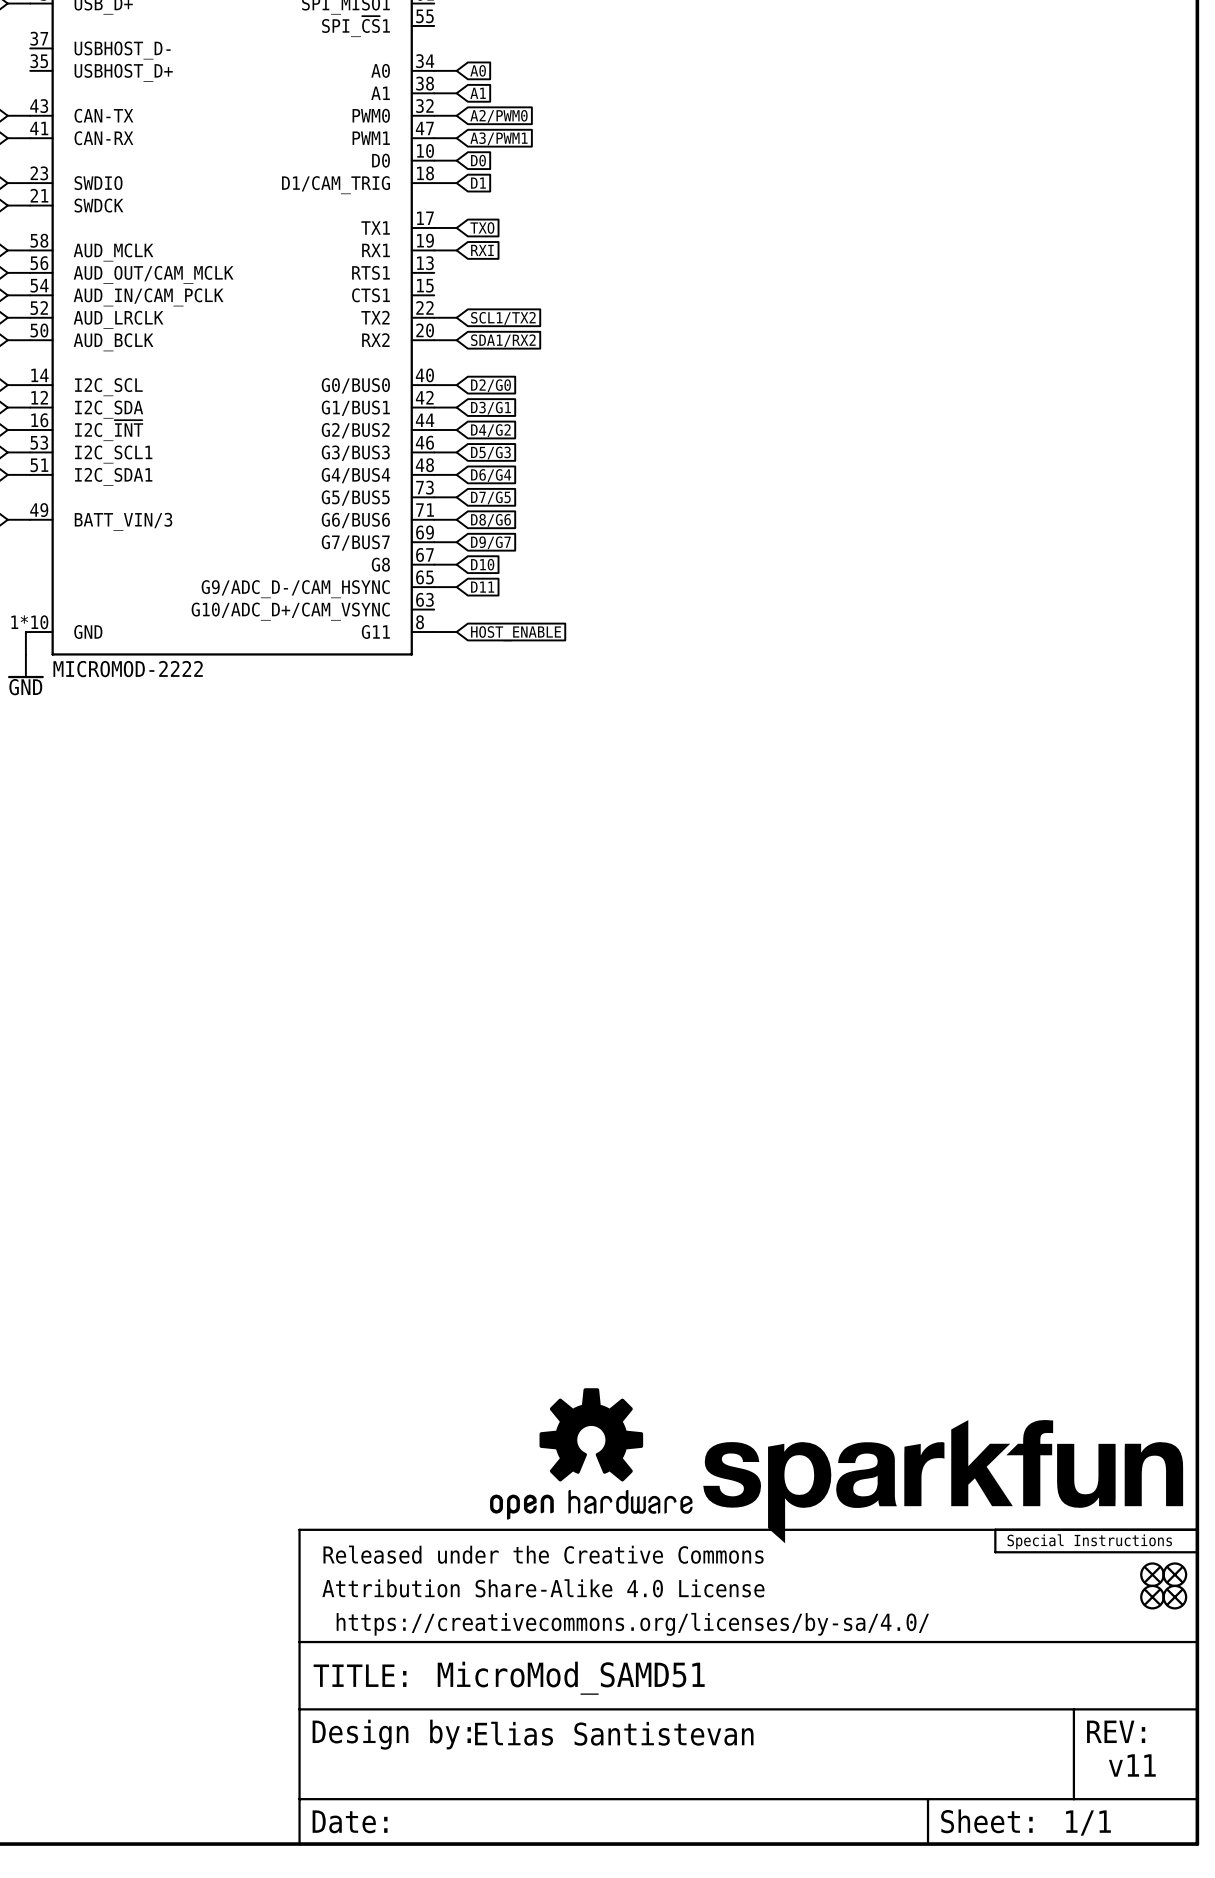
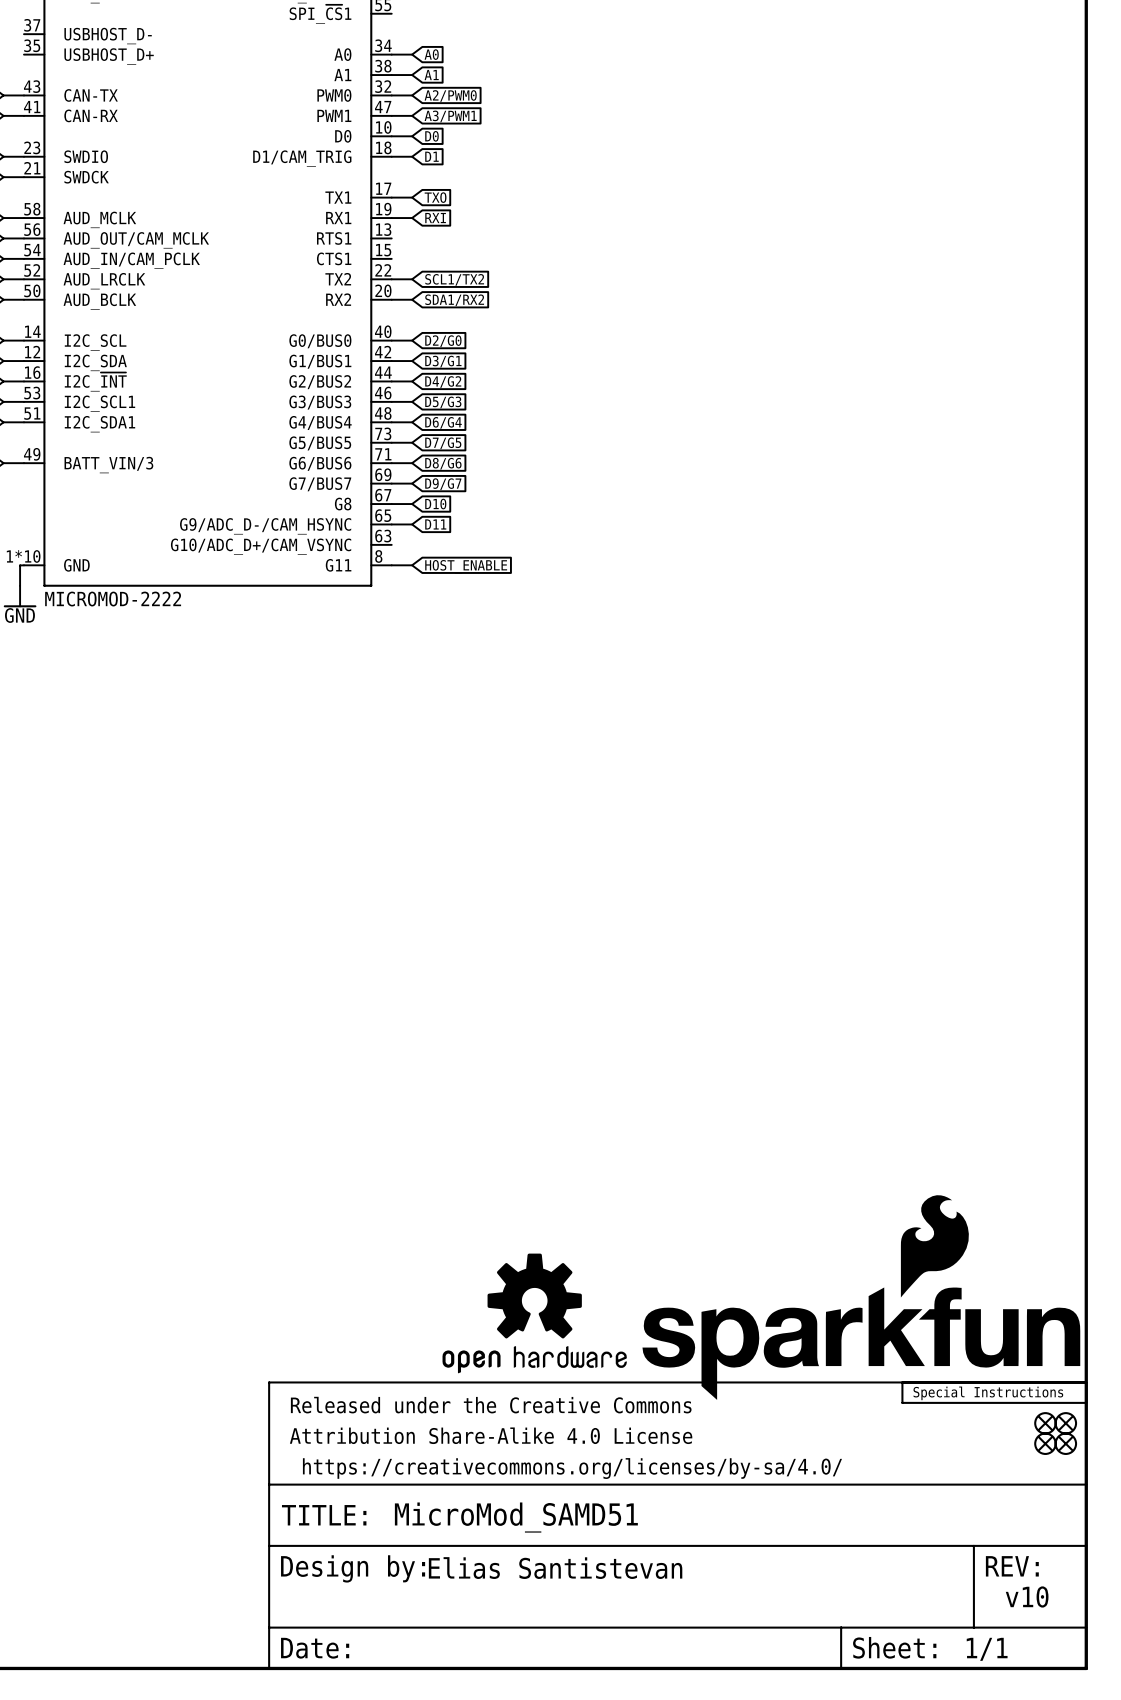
part: none -> (861, 1297)
part: (943, 1481) -> none
text: v11 (1132, 1765) -> v10 (1027, 1596)

